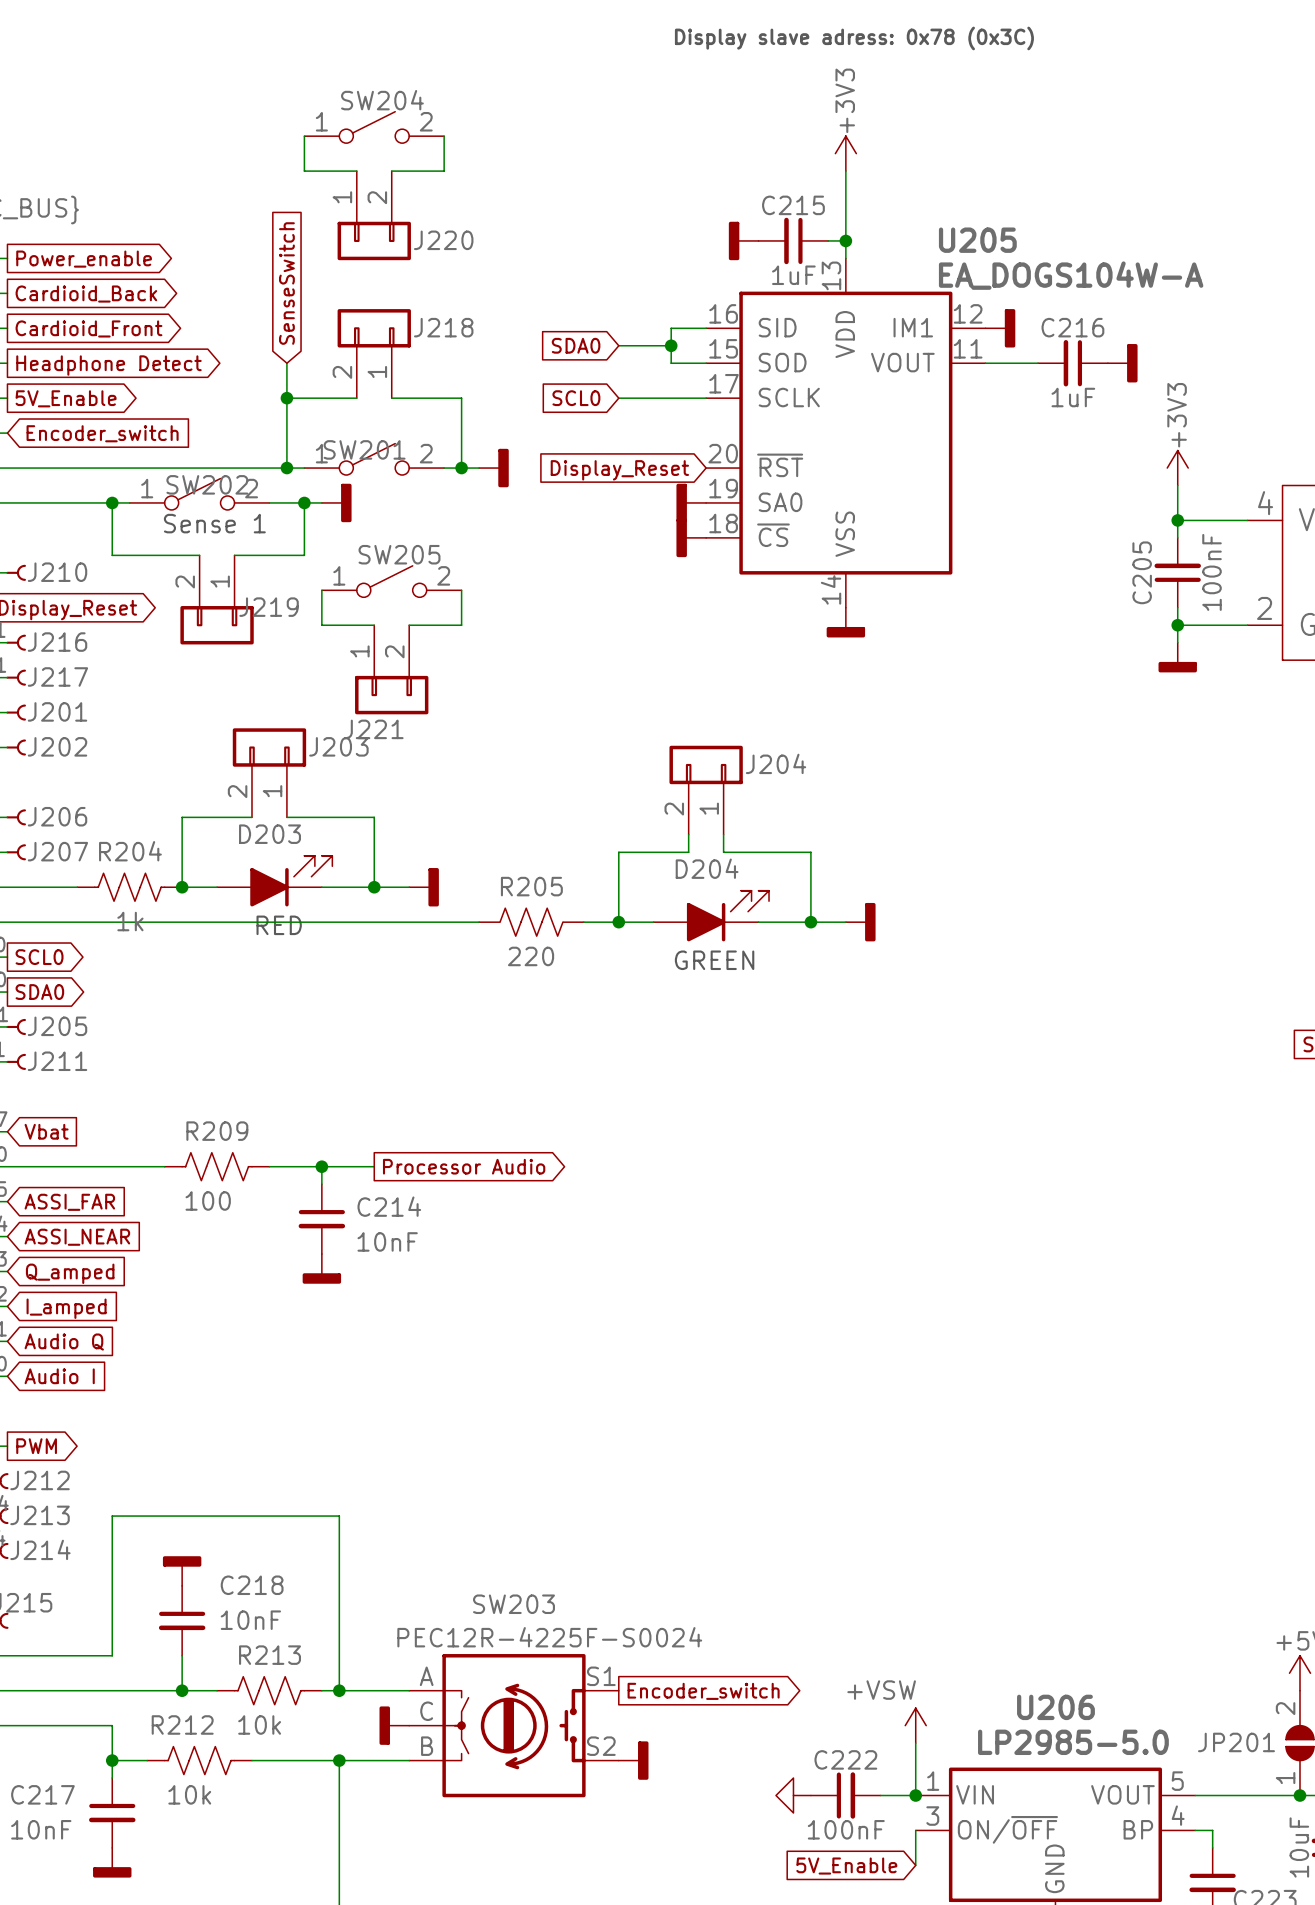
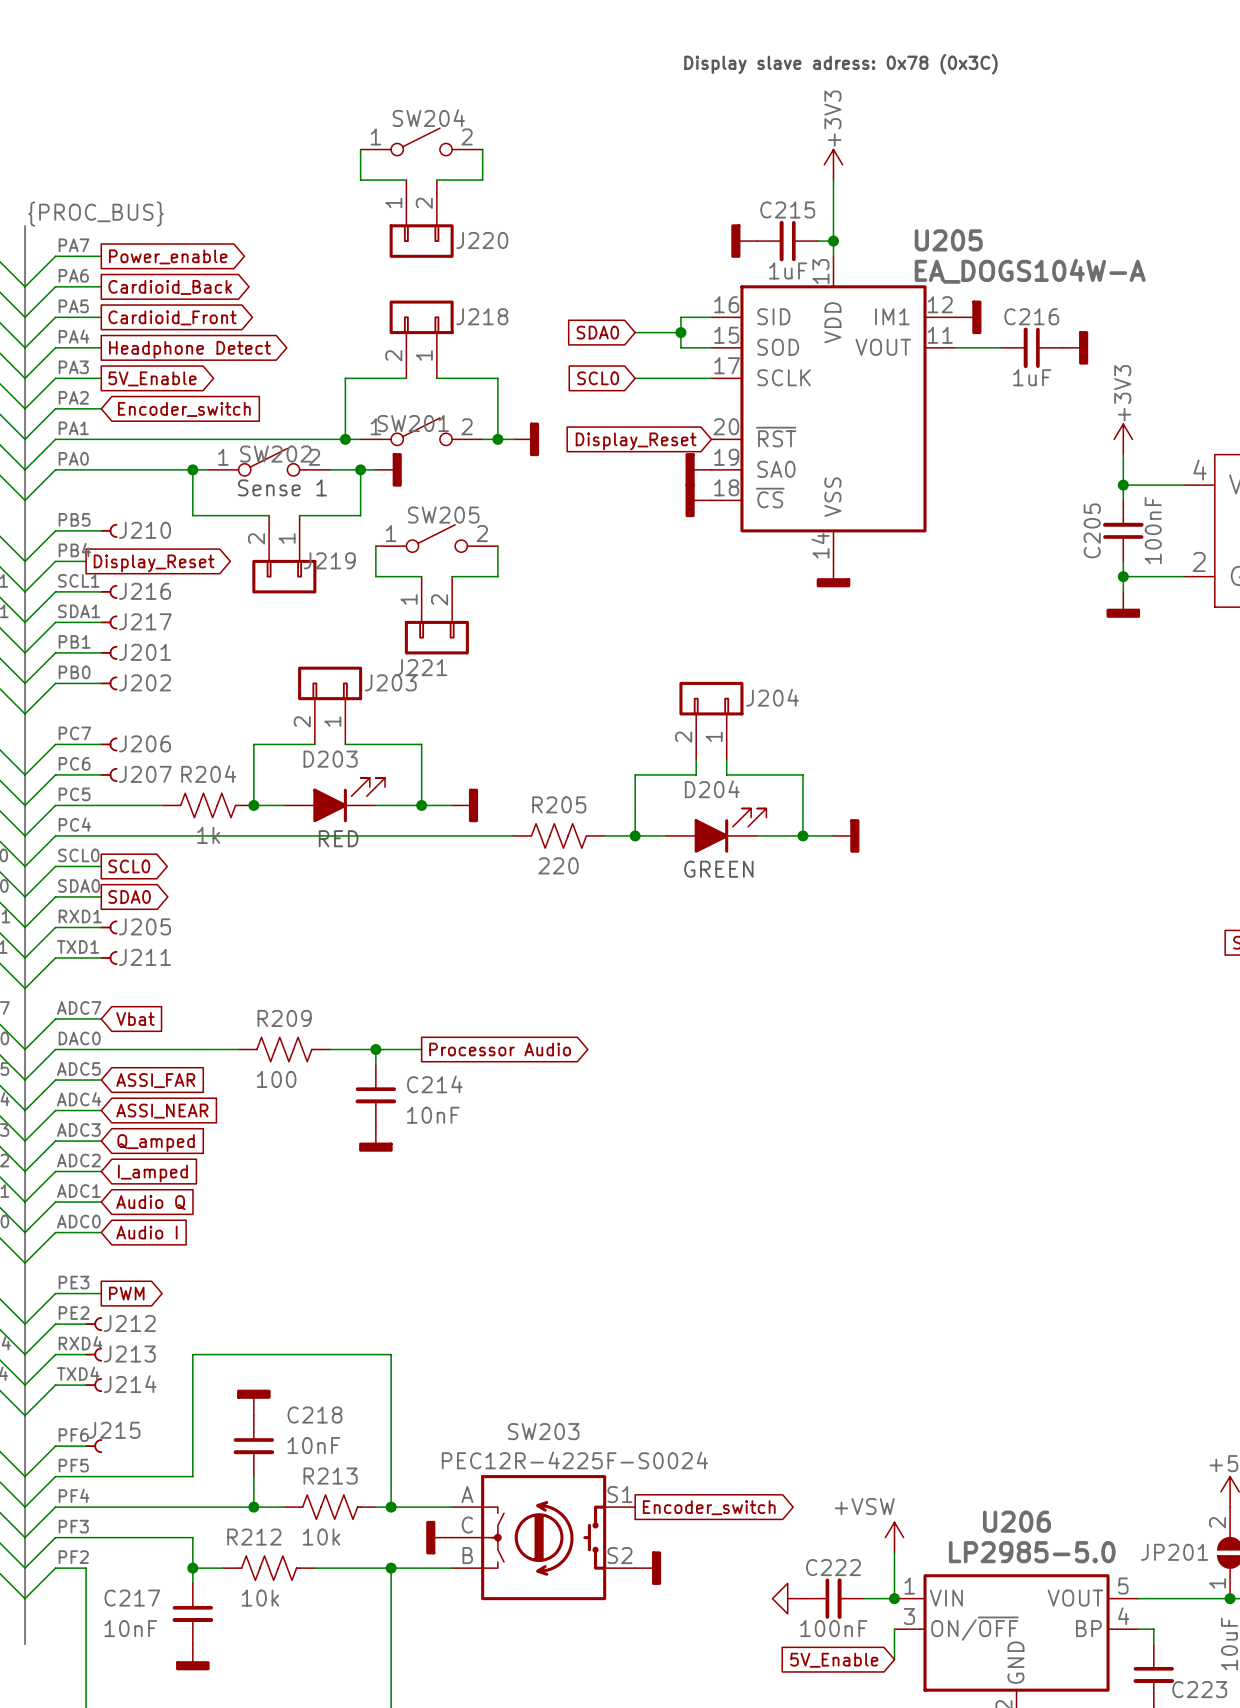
global label: SenseSwitch (286, 283) -> none
wire: (286, 363) (286, 398) -> none
junction: (286, 398) -> none

